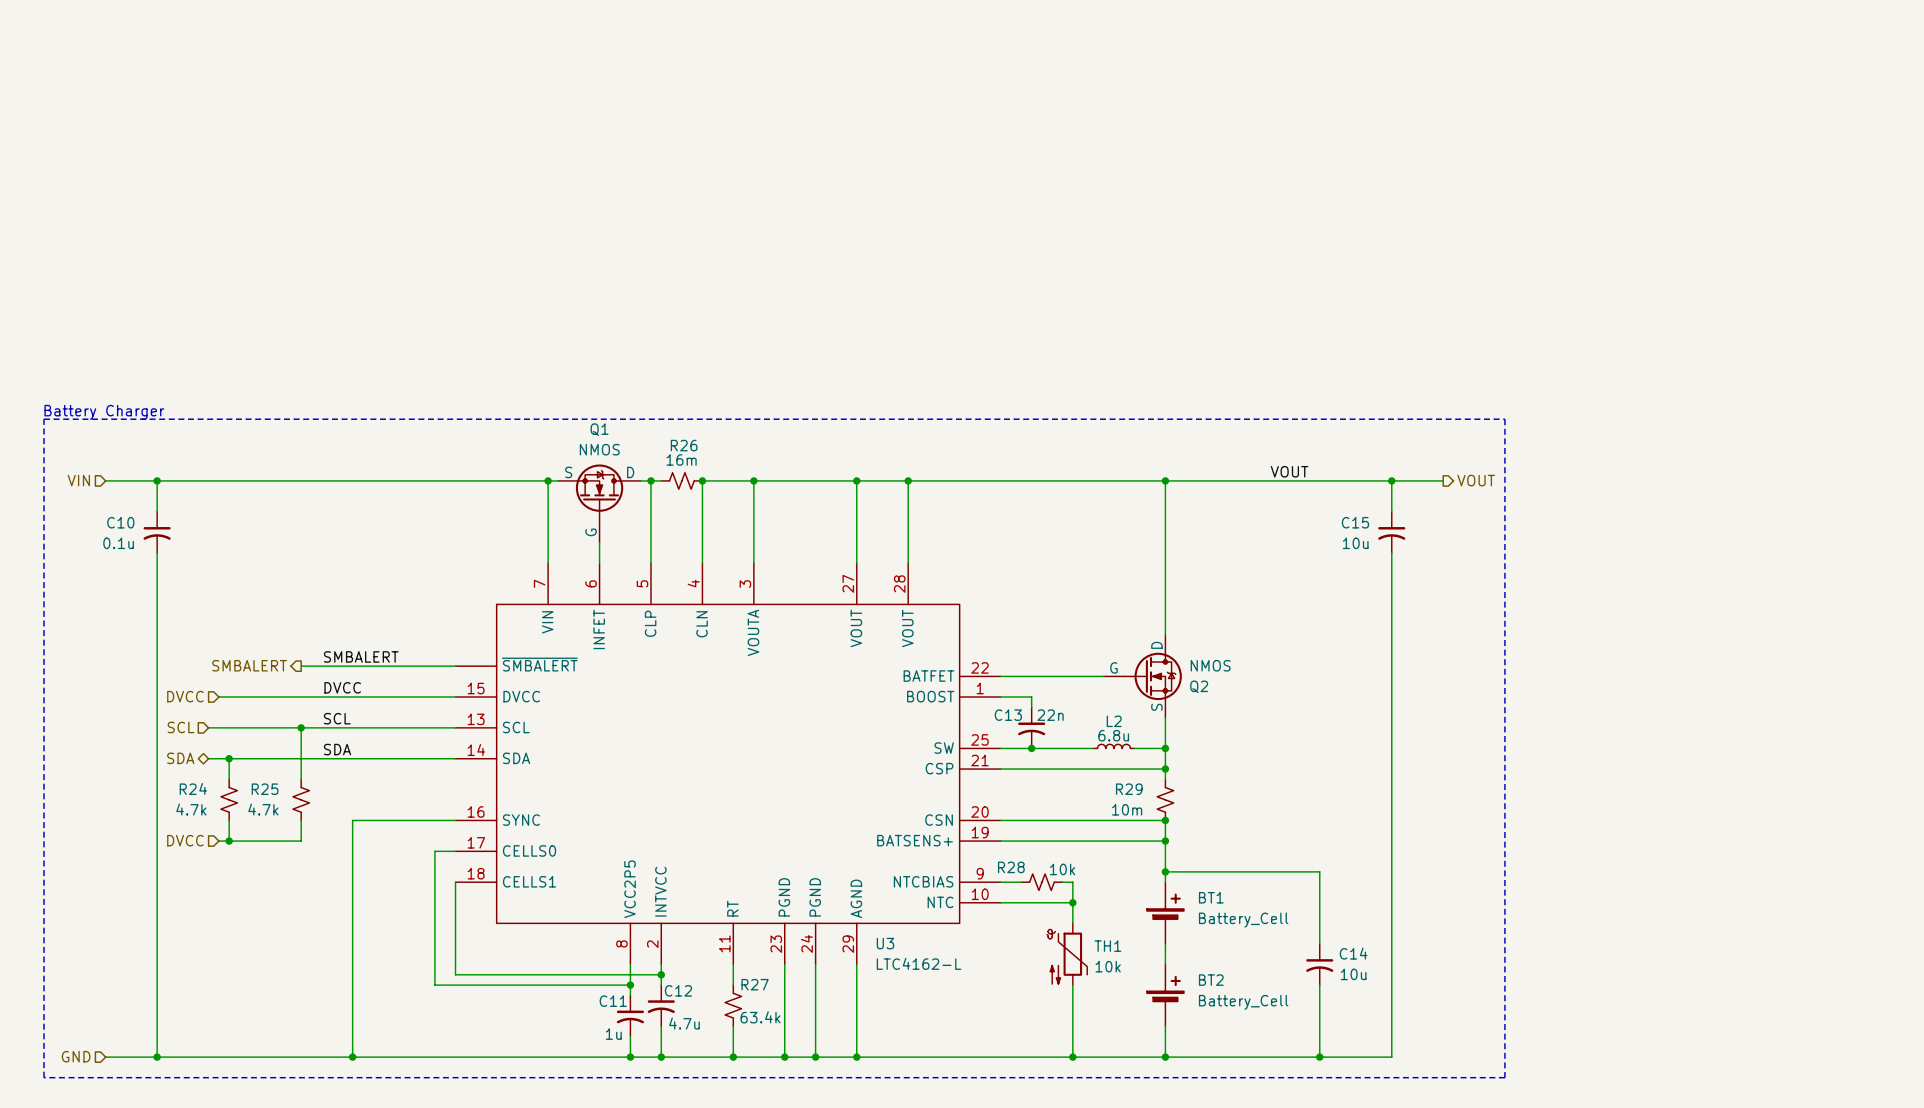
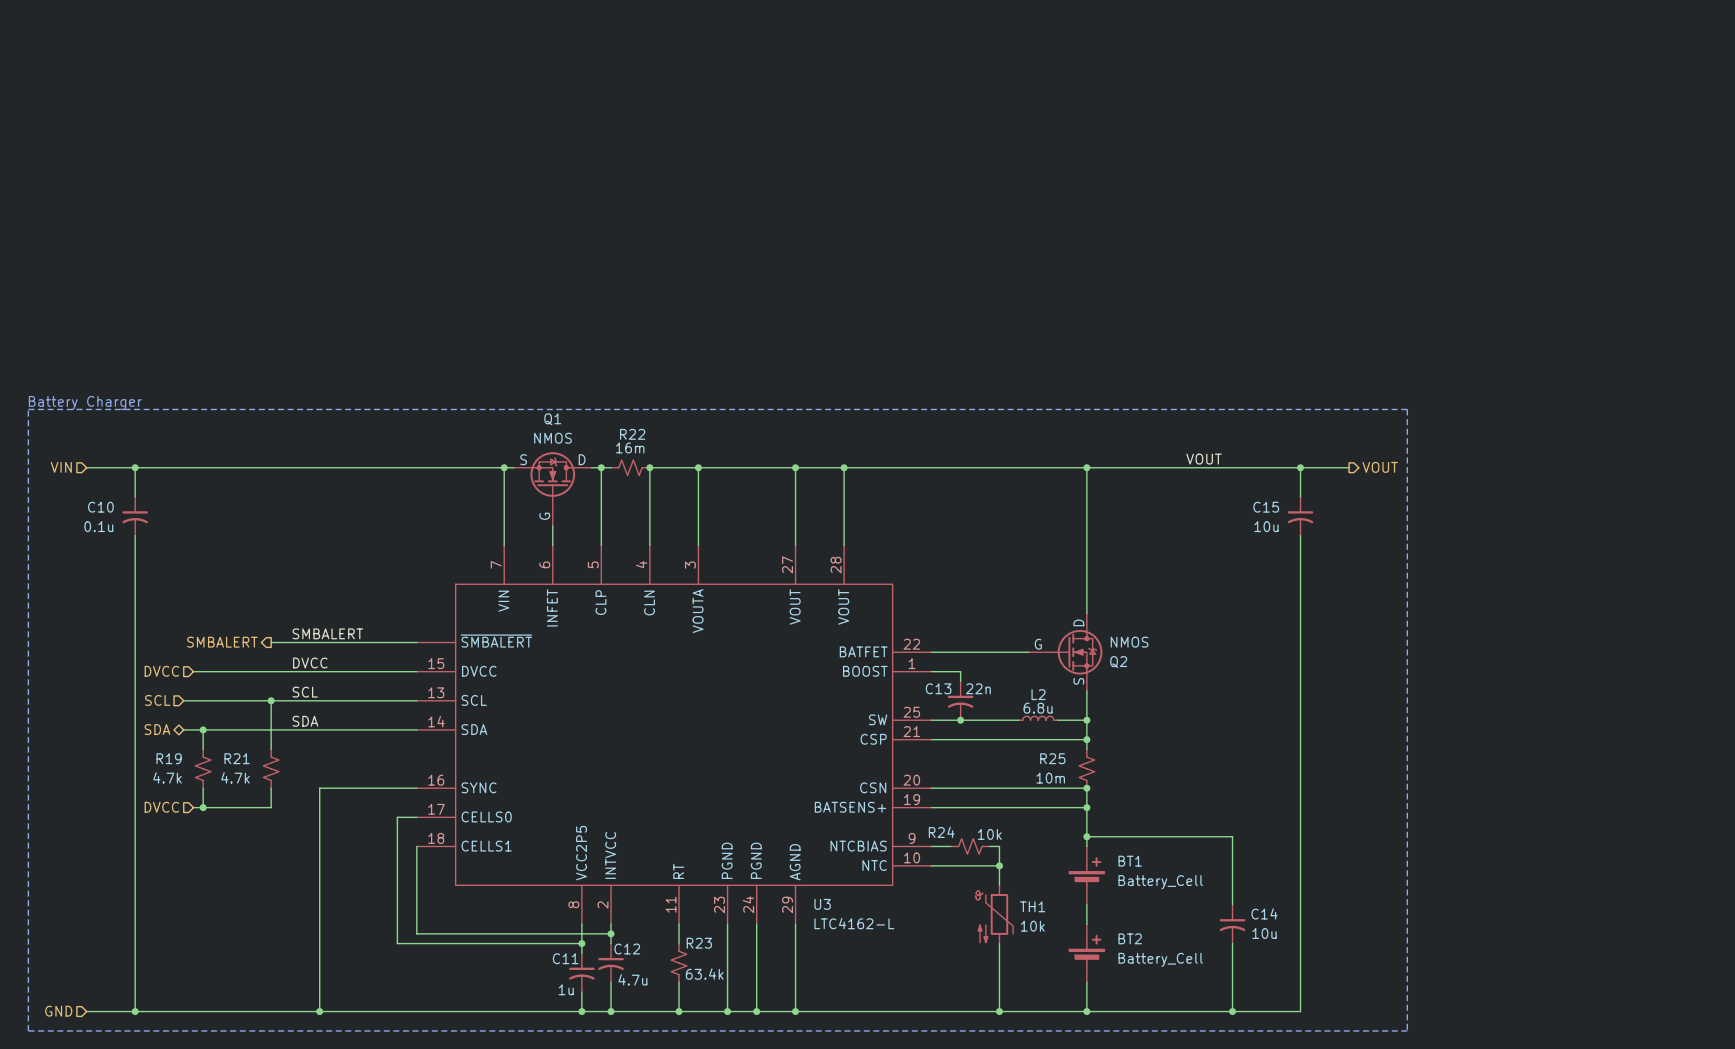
R26 name: R26 (684, 445) -> R22 (632, 434)
R24 name: R24 (193, 788) -> R19 (169, 758)
R25 name: R25 (265, 789) -> R21 (237, 758)
R29 name: R29 (1129, 789) -> R25 (1052, 758)
R28 name: R28 (1011, 867) -> R24 (941, 832)
R27 name: R27 (755, 984) -> R23 (699, 943)

